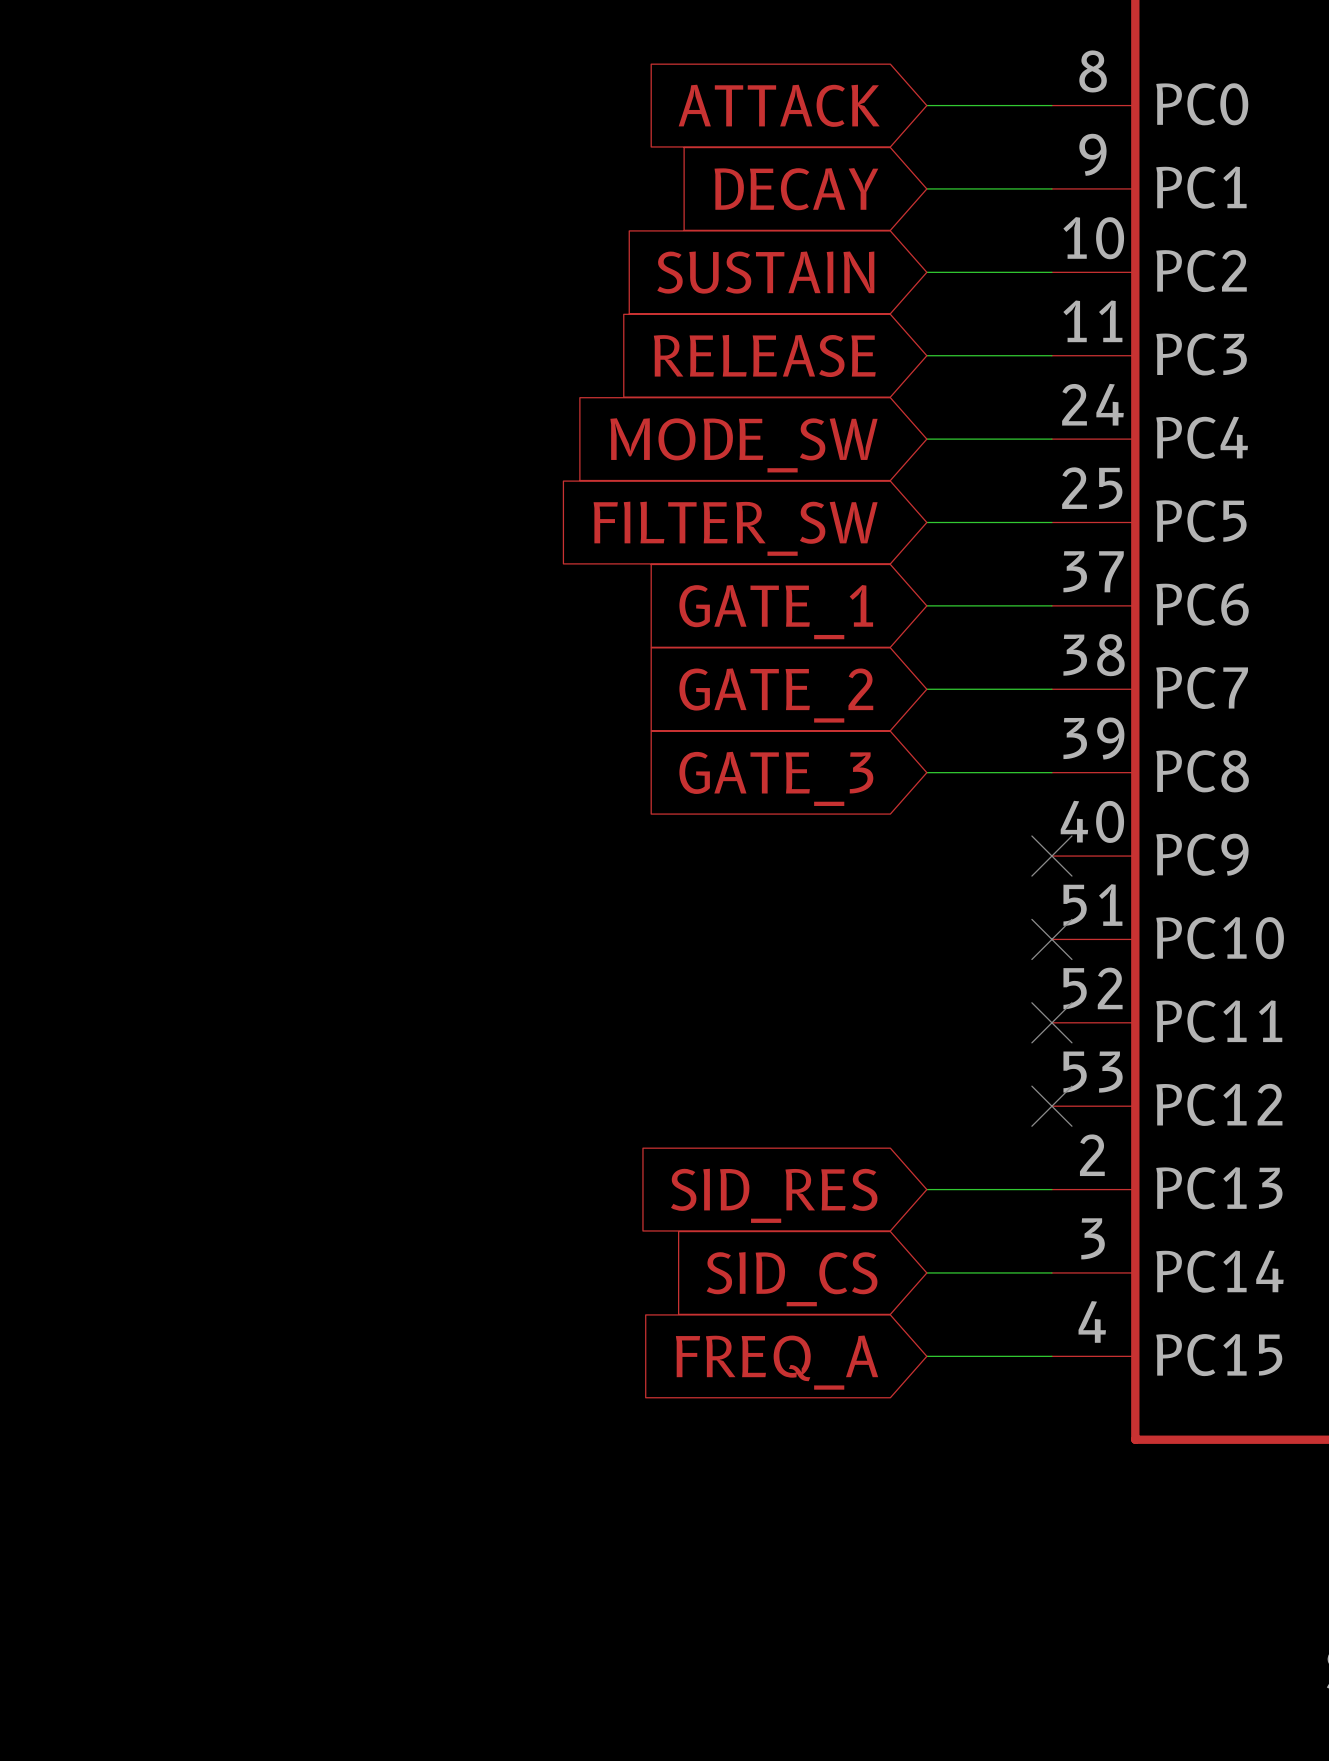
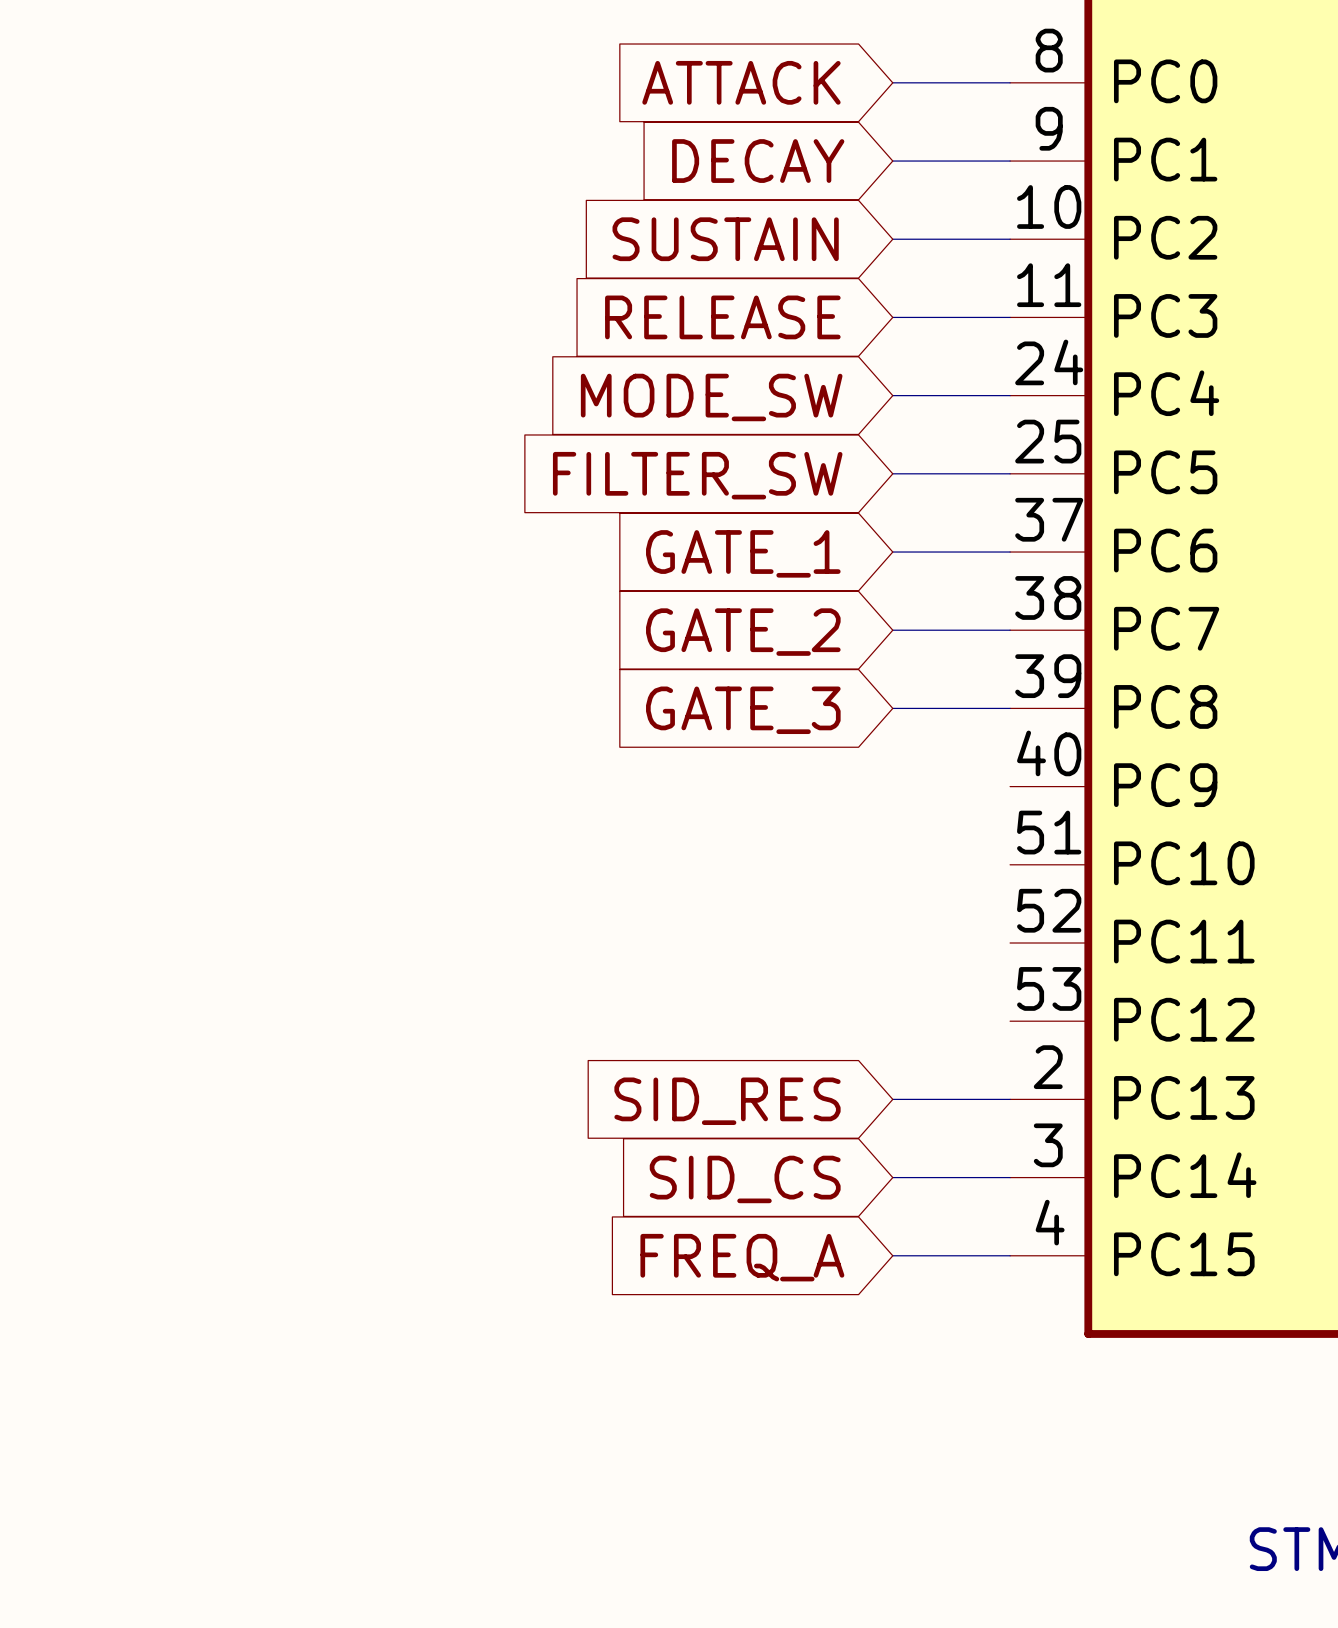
no-connect mark: (1051, 856) -> none
no-connect mark: (1051, 939) -> none
no-connect mark: (1051, 1022) -> none
no-connect mark: (1051, 1106) -> none

